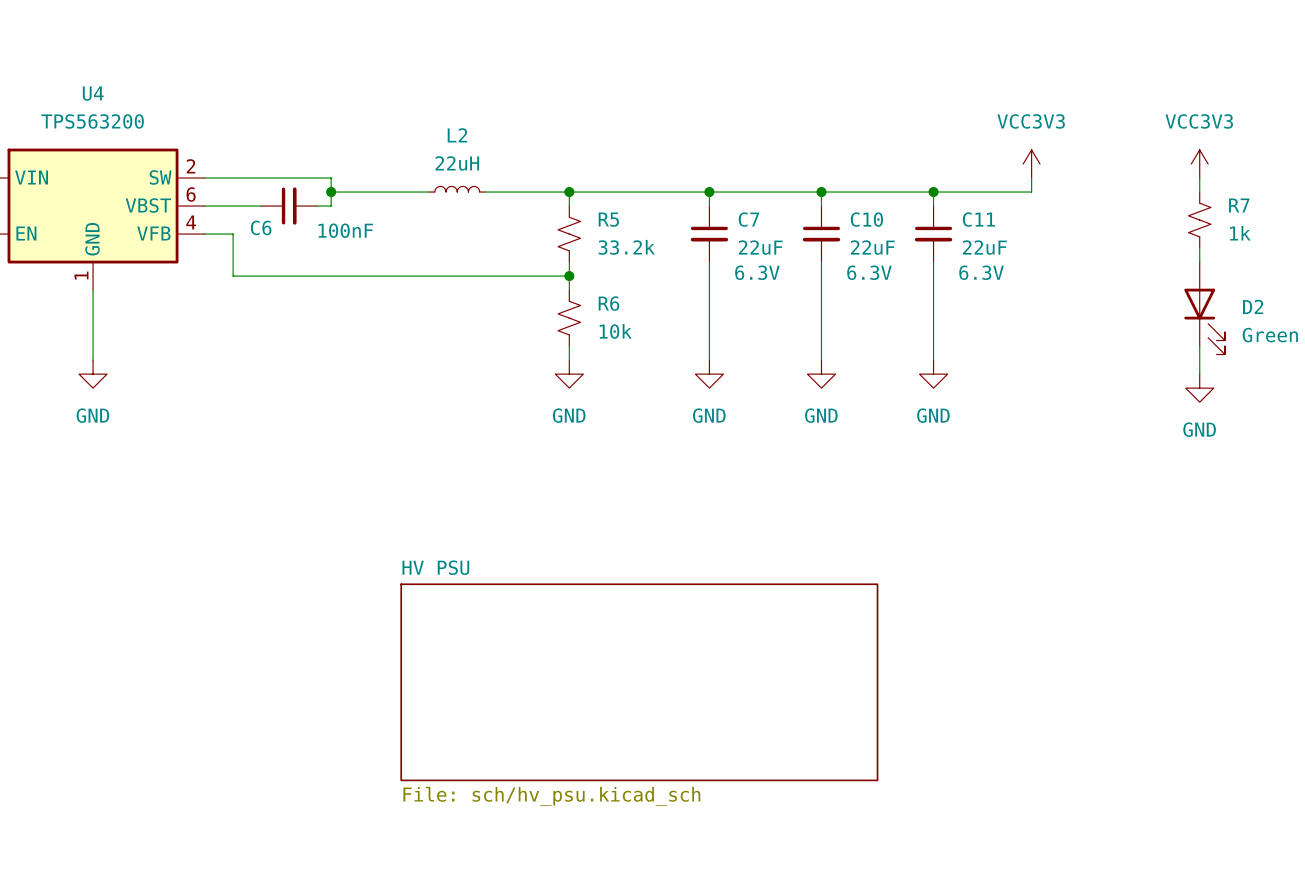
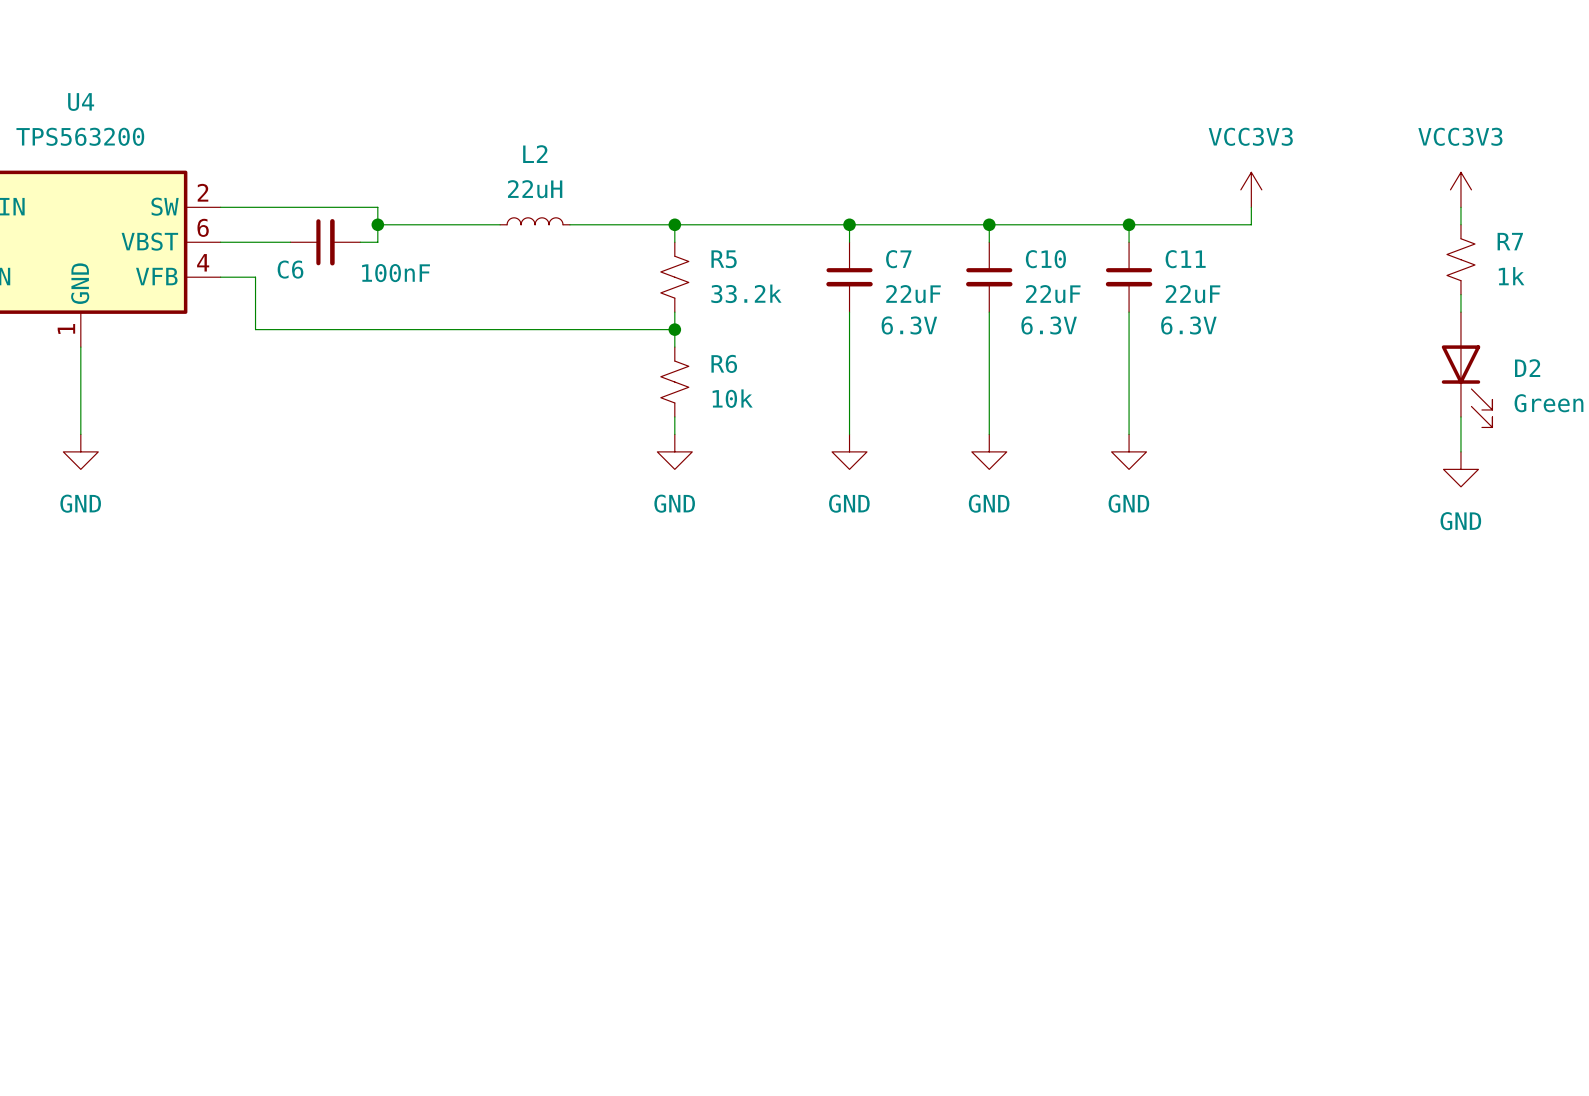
sheet HV PSU: File: sch/hv_psu.kicad_sch (639, 682) -> none

